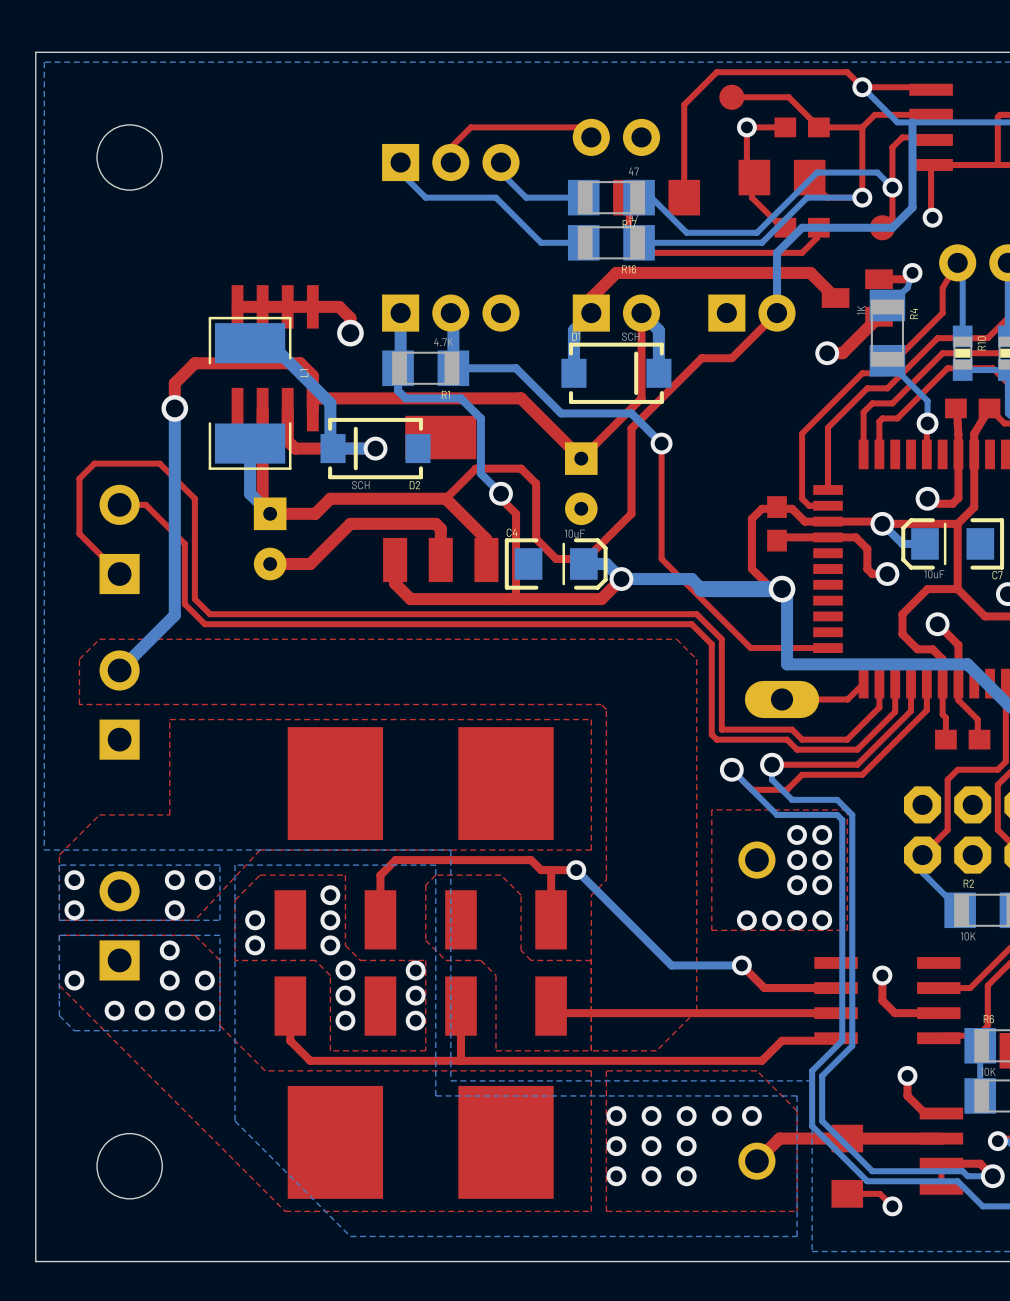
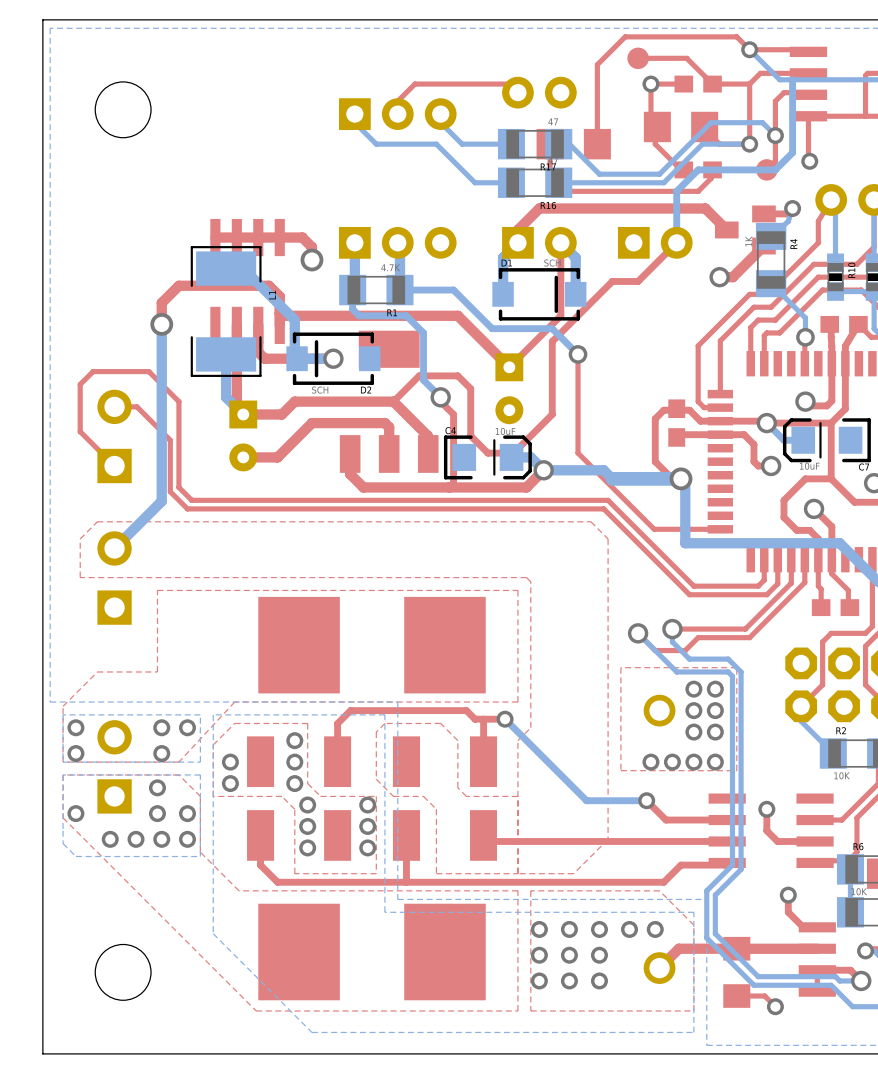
top track: (721, 639) (721, 729) (792, 729) (802, 739) (847, 739) (872, 714) -> (629, 521) (693, 586) (758, 586)
top track: (711, 644) (711, 734) (716, 739) (787, 739) (797, 749) (857, 749) (882, 724) -> (620, 526) (689, 594) (766, 594)
top track: (863, 683) (847, 699) (782, 699) -> none
part: (782, 699) -> none

